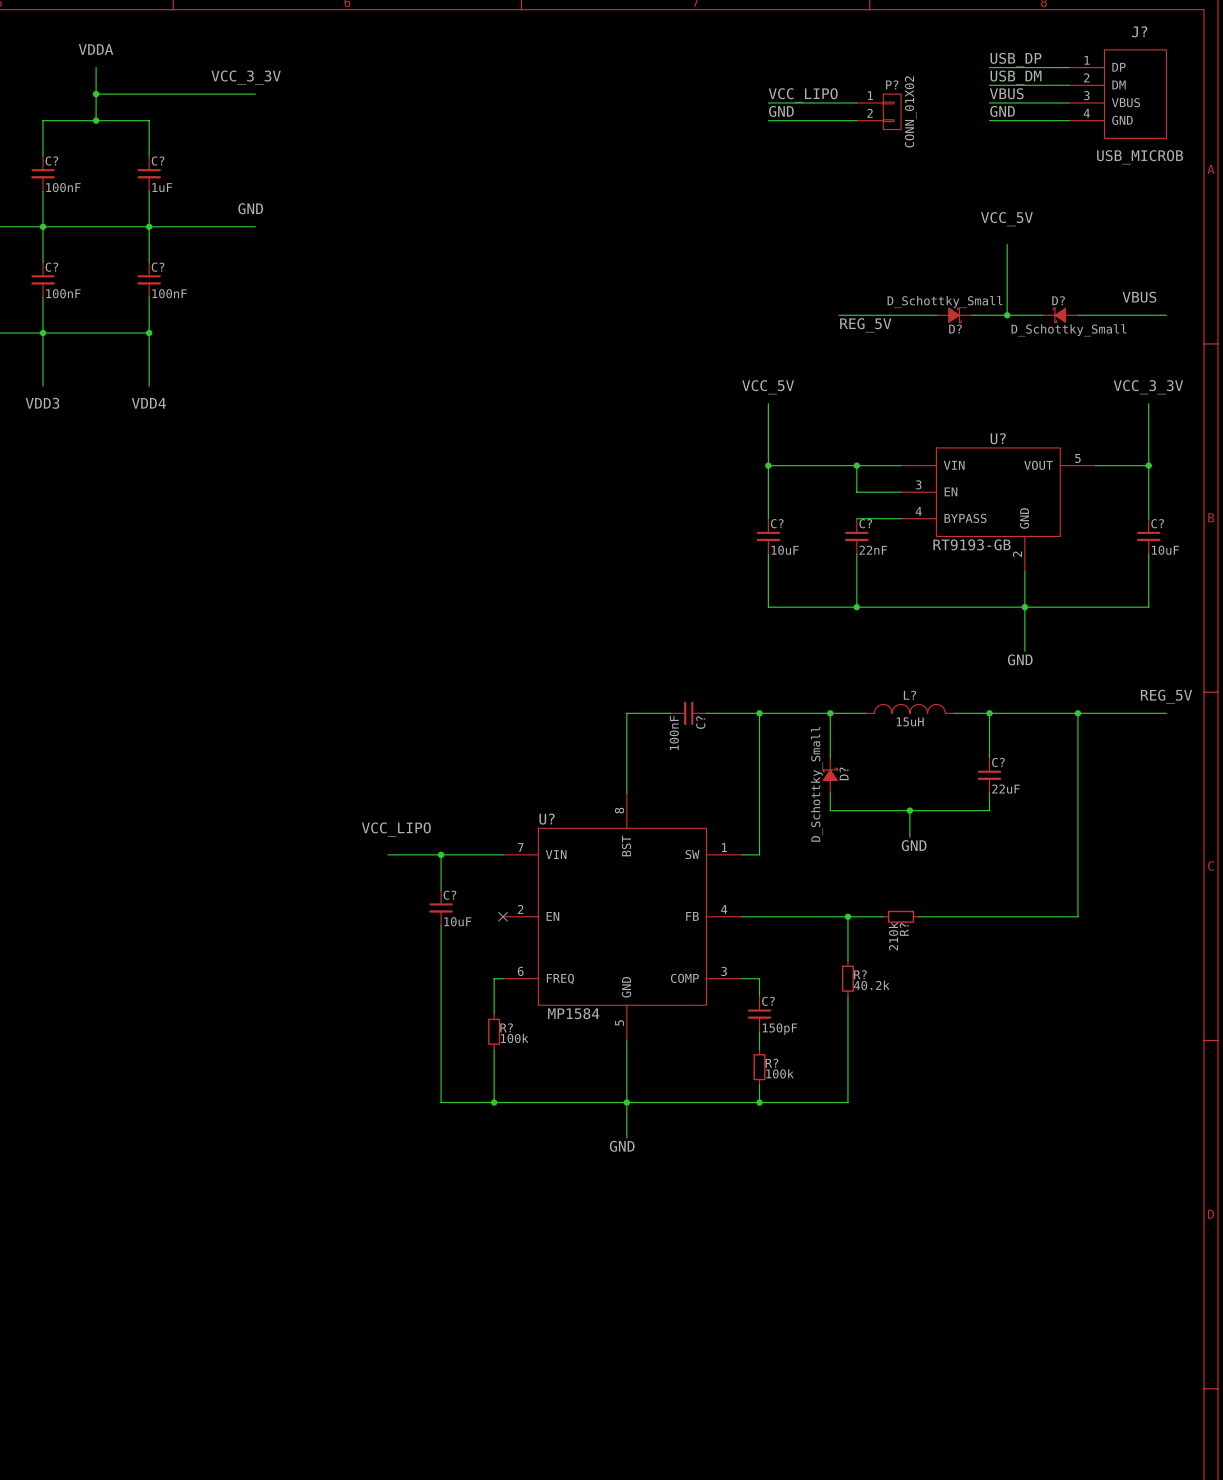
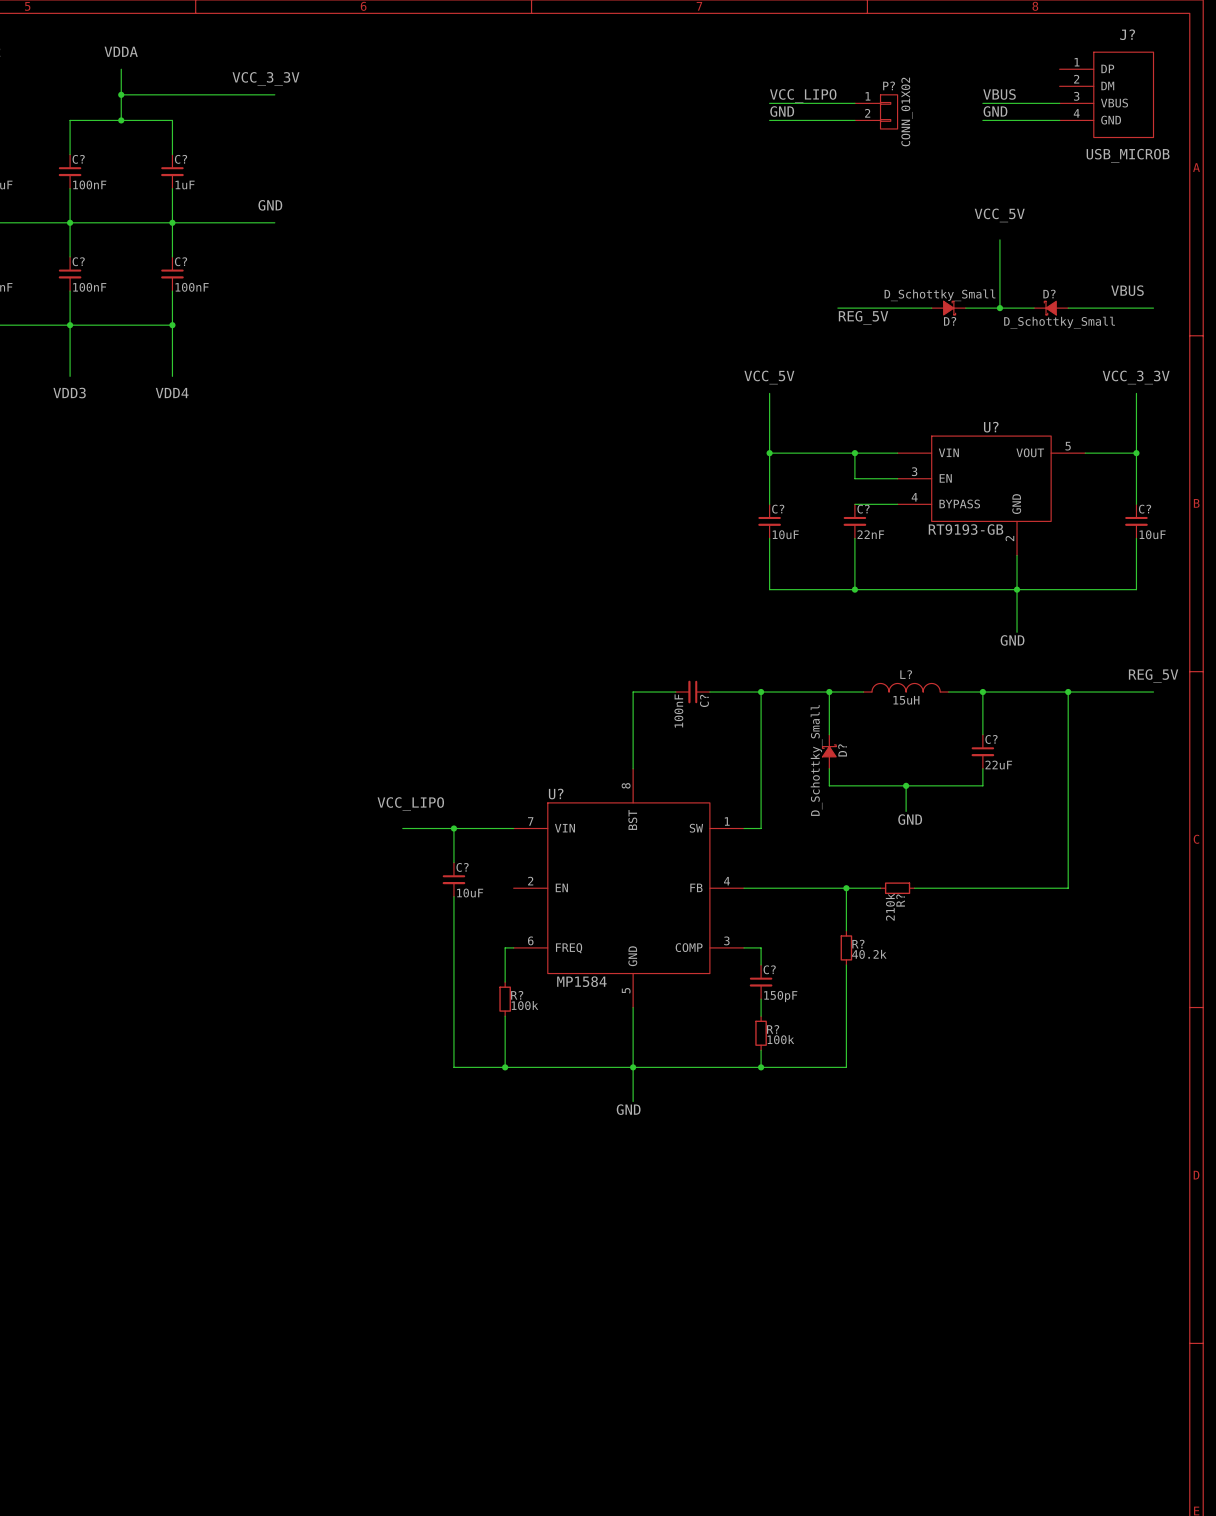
label: USB_DP (1016, 59) -> none
wire: (989, 67) (1069, 67) -> none
label: USB_DM (1016, 77) -> none
wire: (989, 85) (1069, 85) -> none
no-connect mark: (502, 916) -> none

